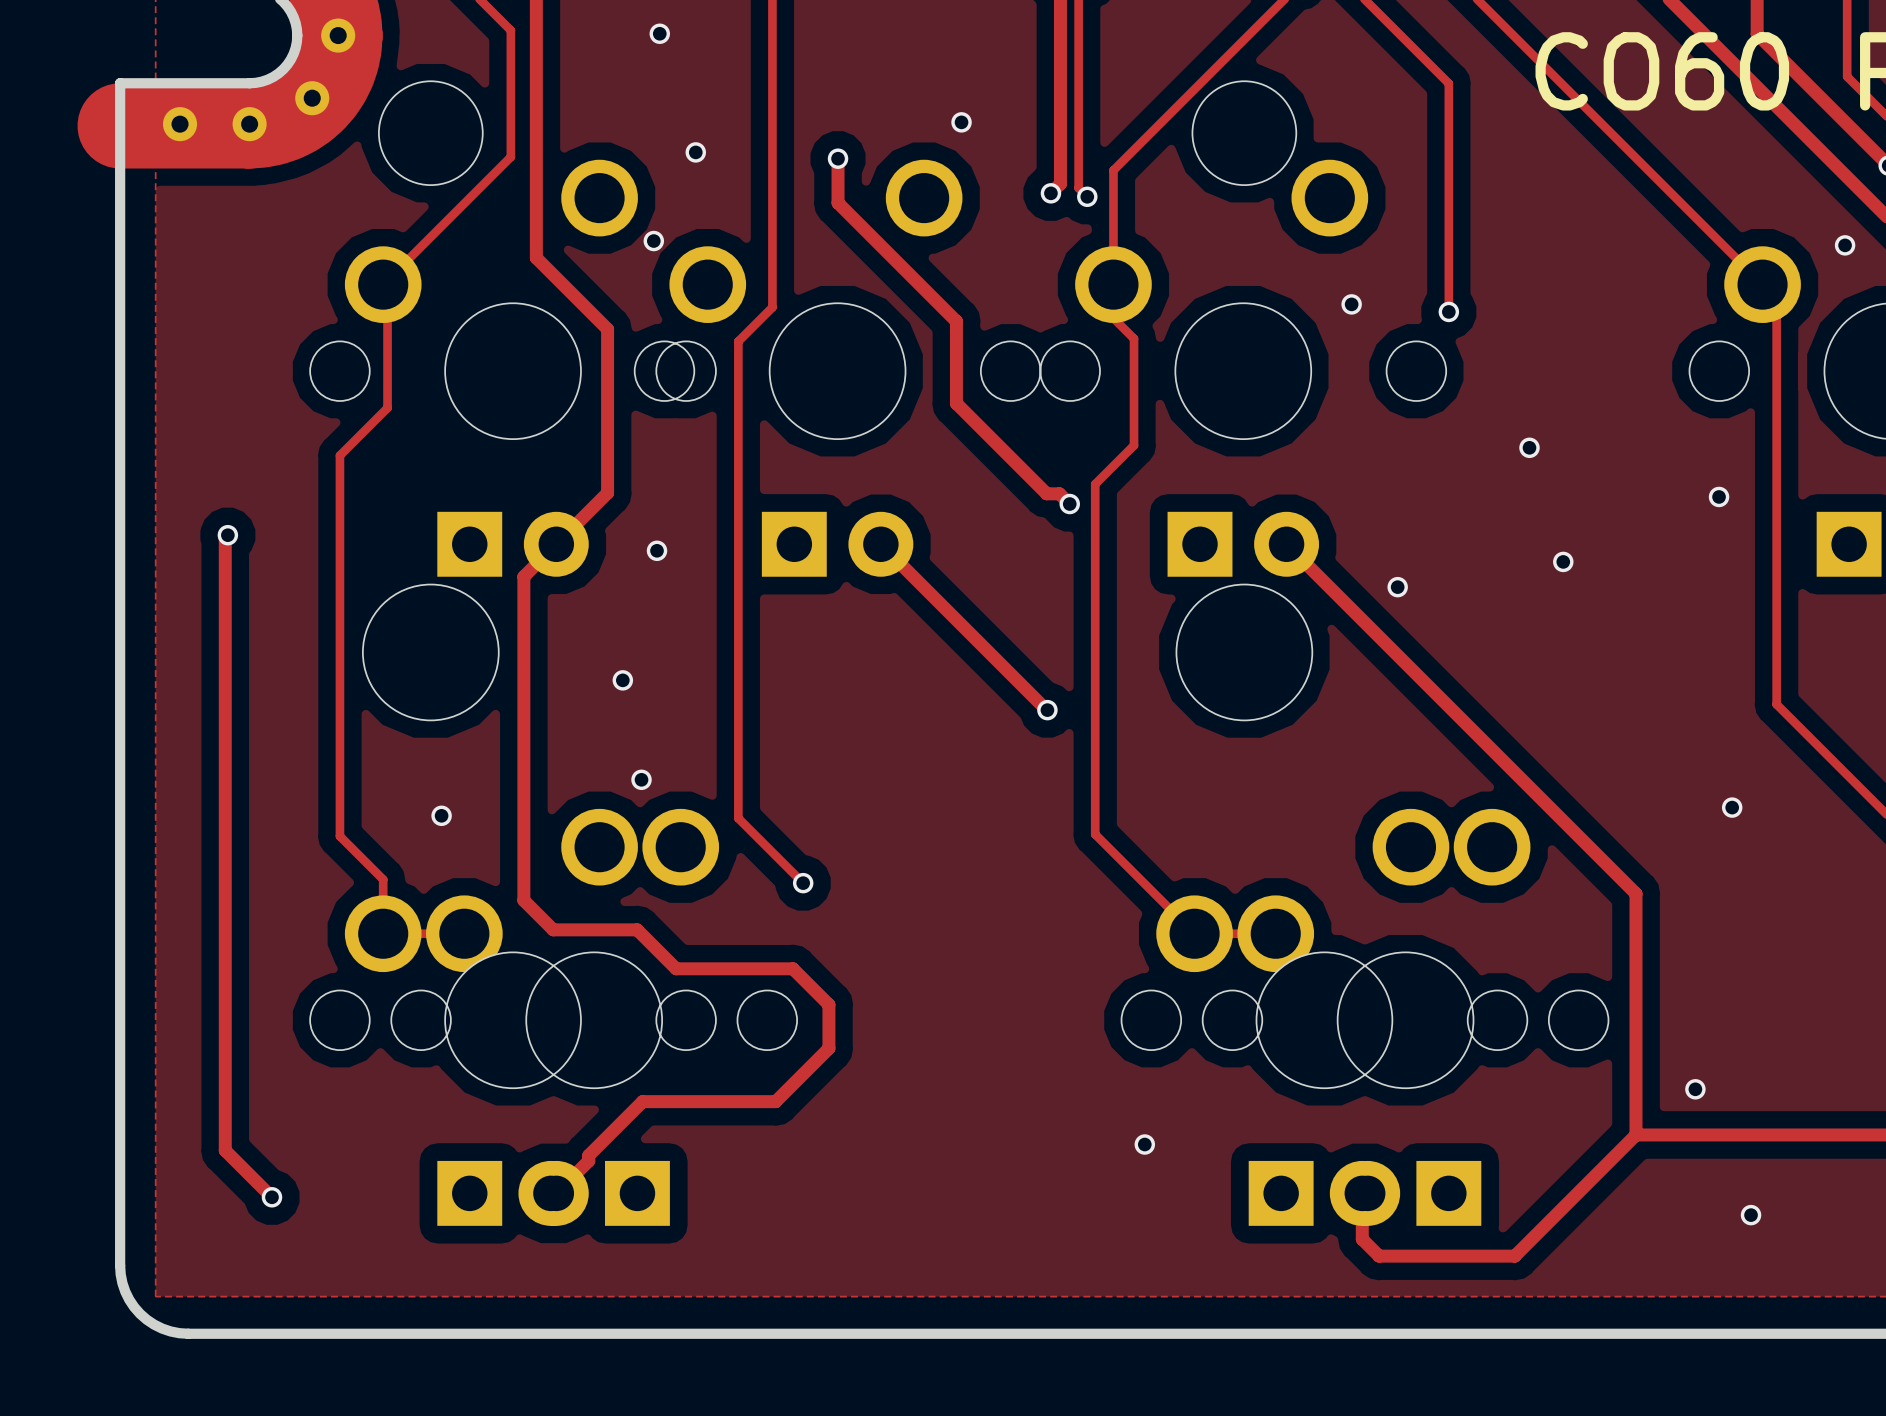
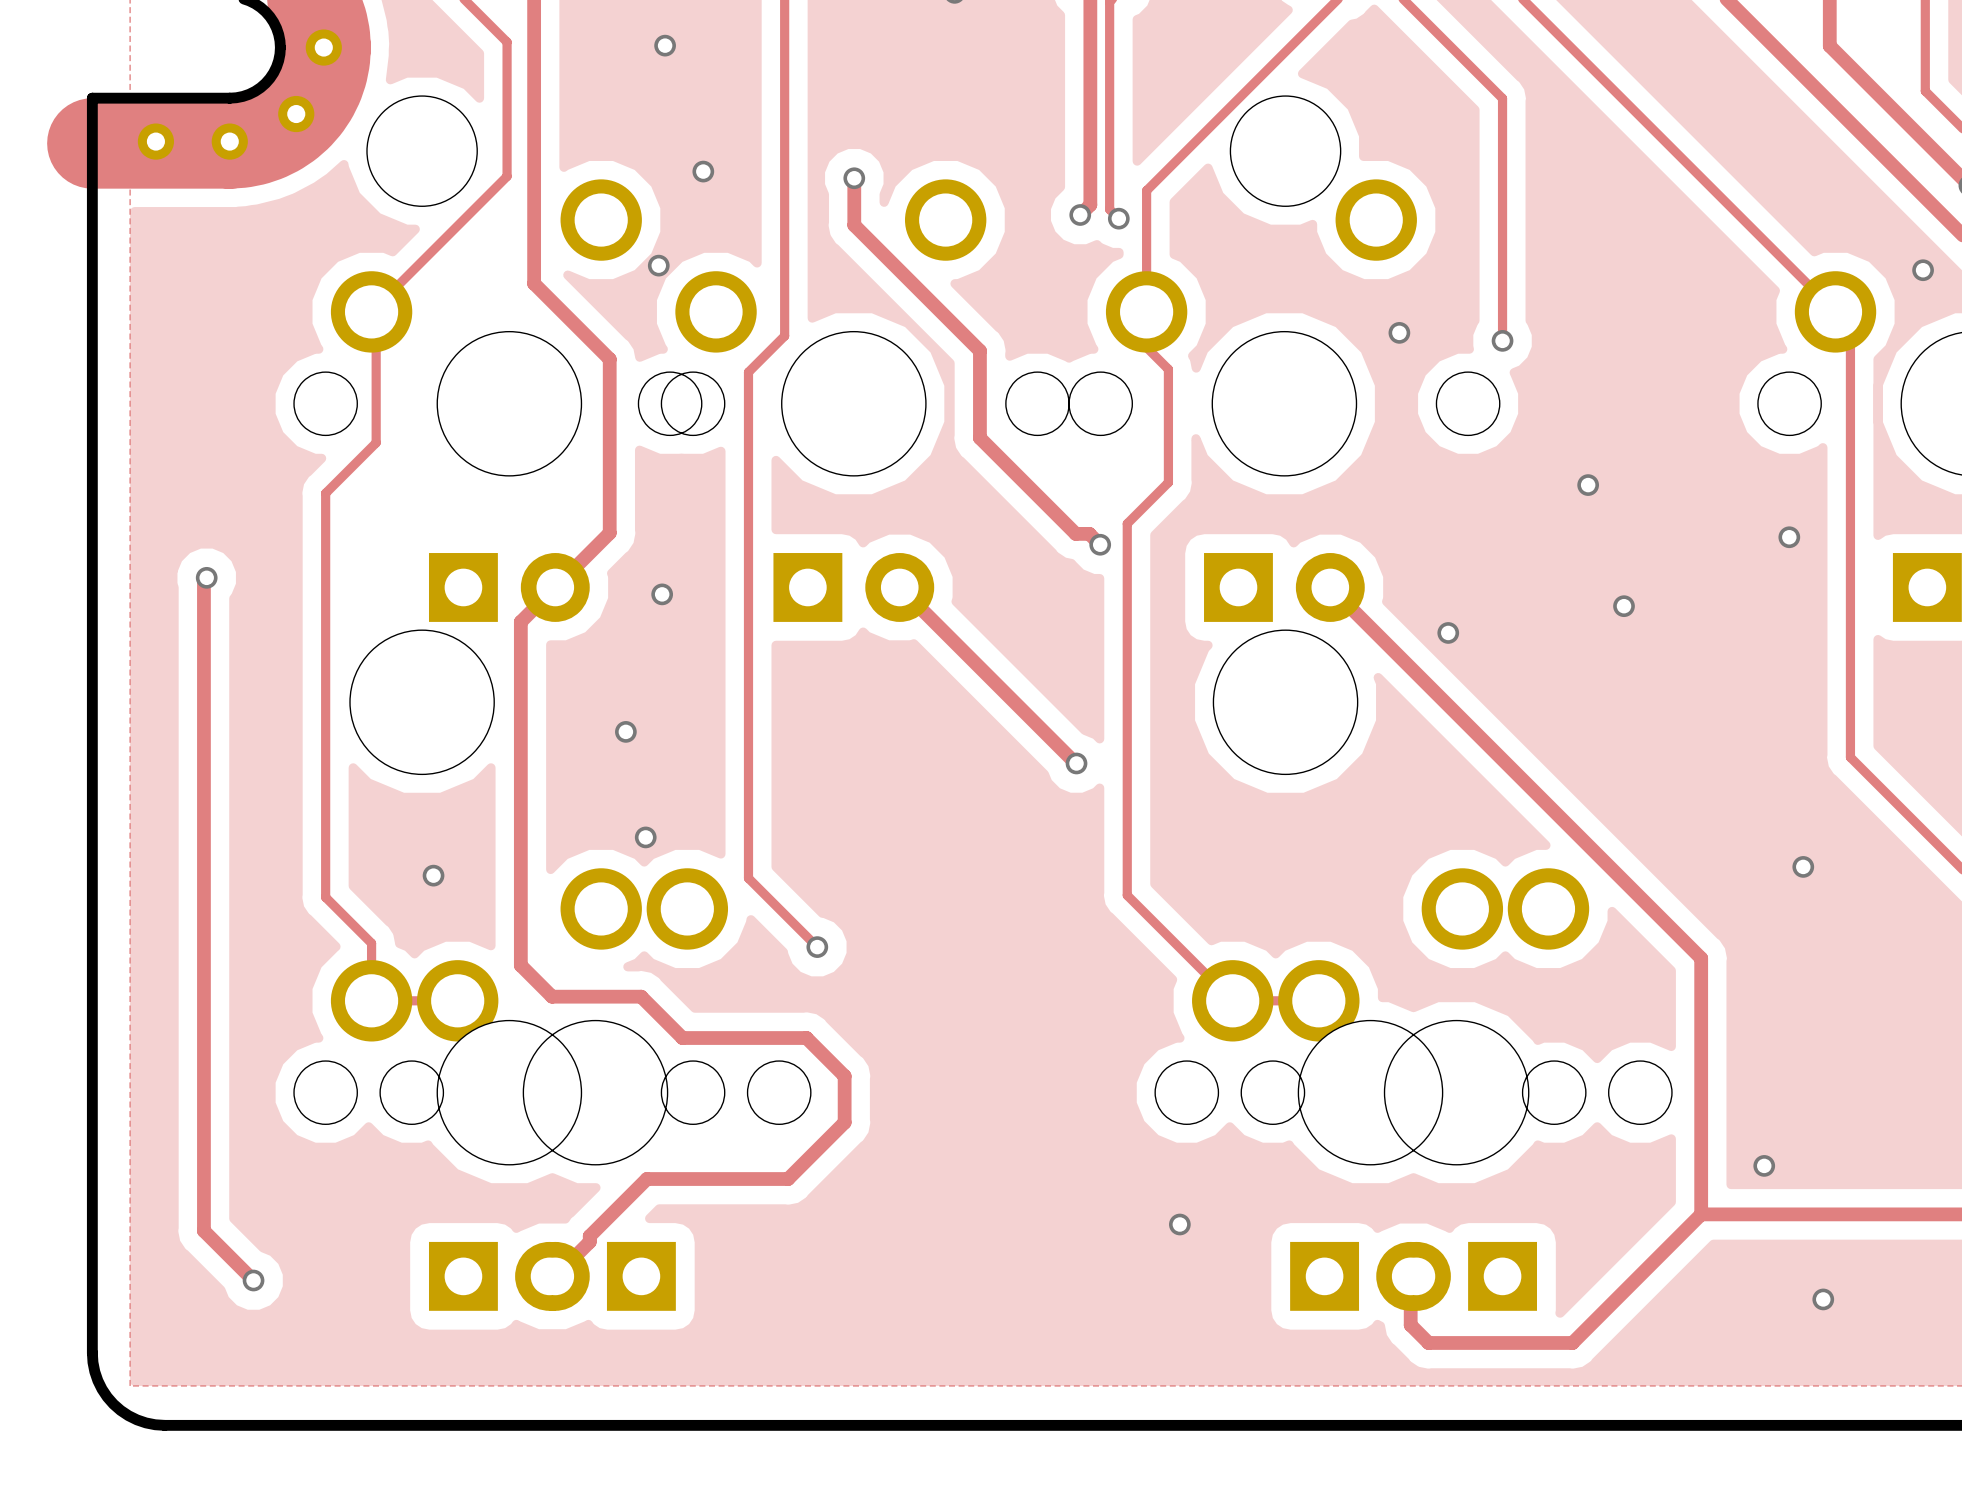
via: (961, 122) -> none

